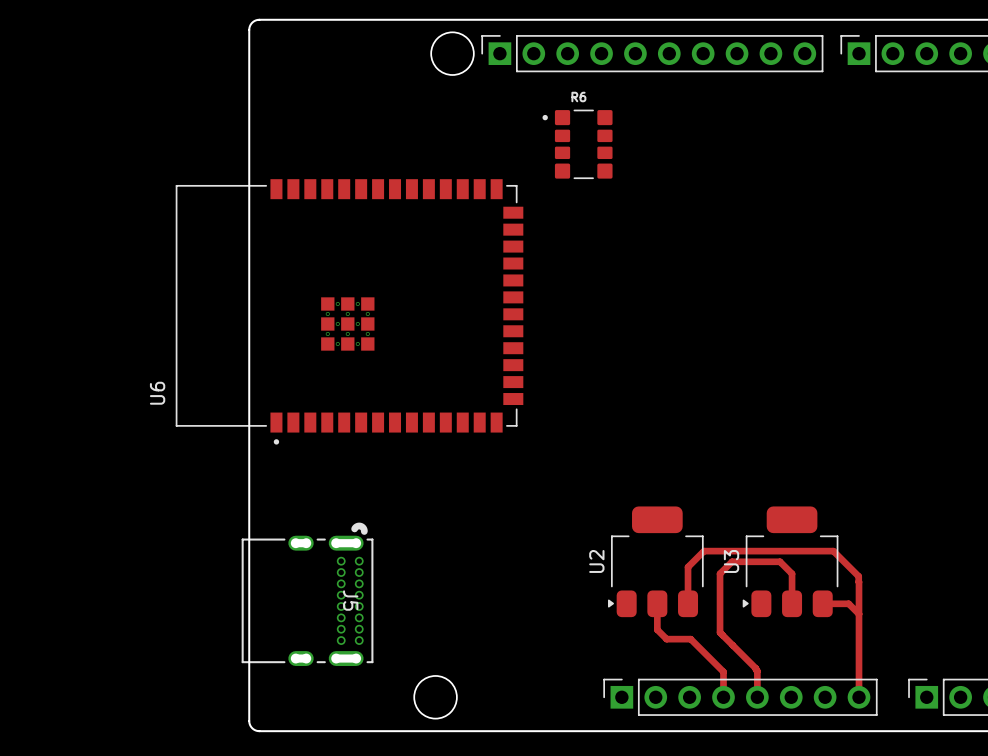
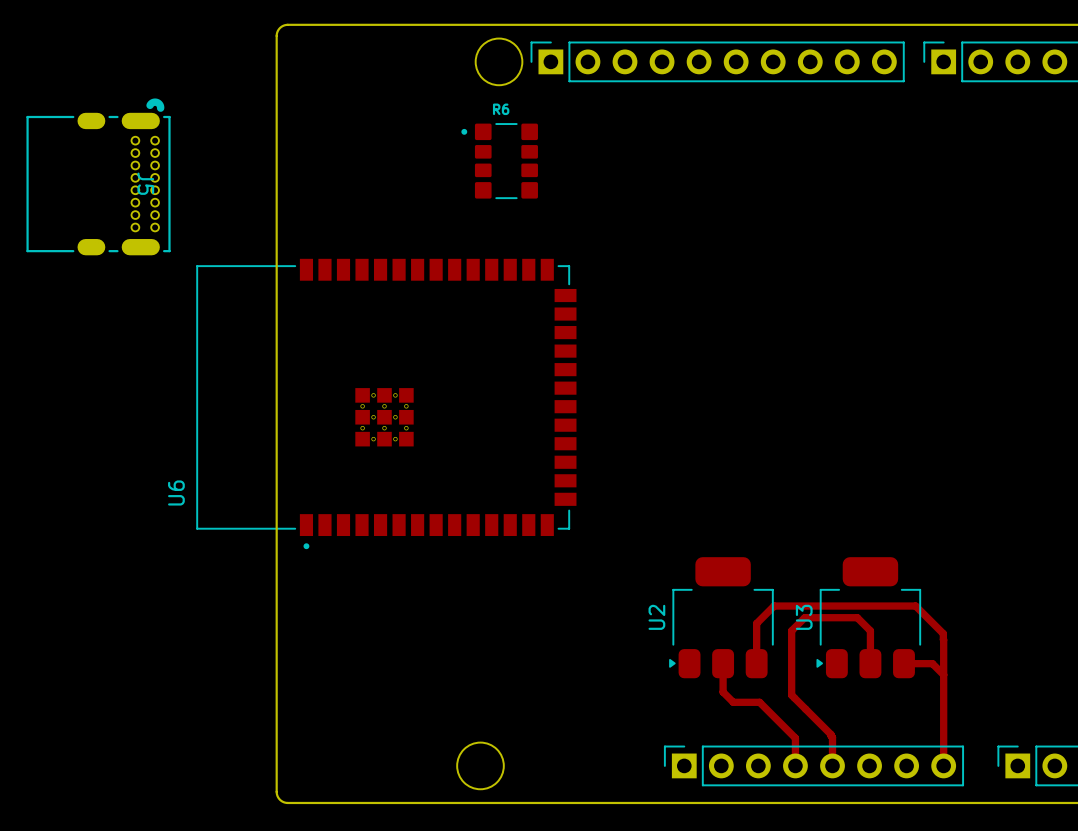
R6 position: (577, 144) -> (499, 161)
U6 position: (349, 311) -> (386, 403)
J5 position: (307, 594) -> (98, 176)

